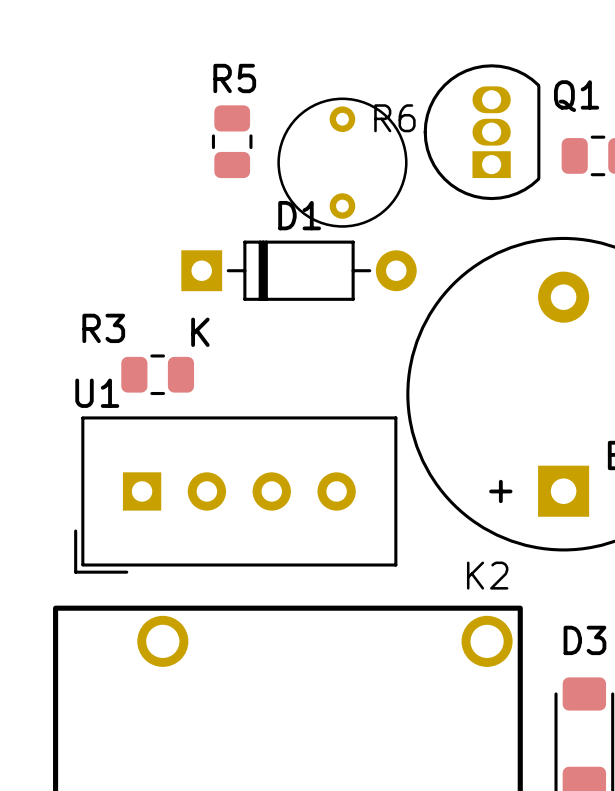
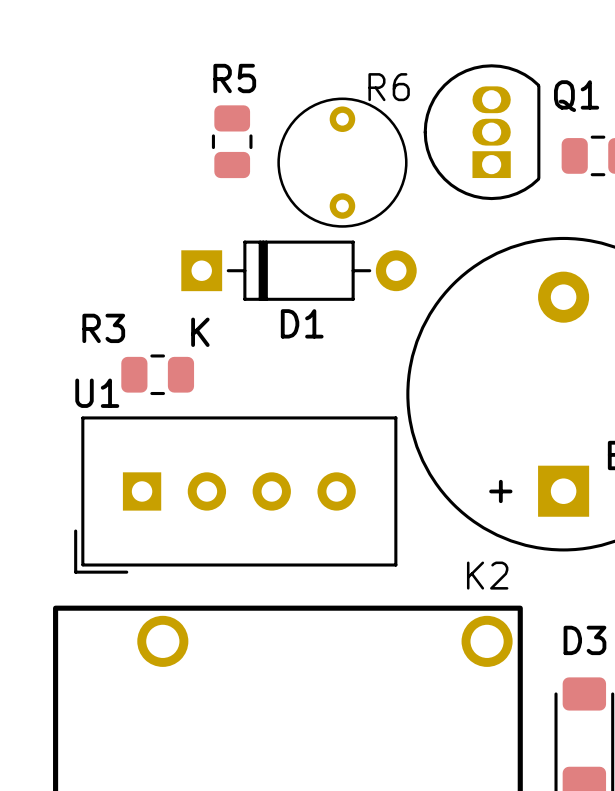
R6 name position: R6 (394, 118) -> R6 (389, 87)
D1 name position: D1 (299, 215) -> D1 (302, 323)

